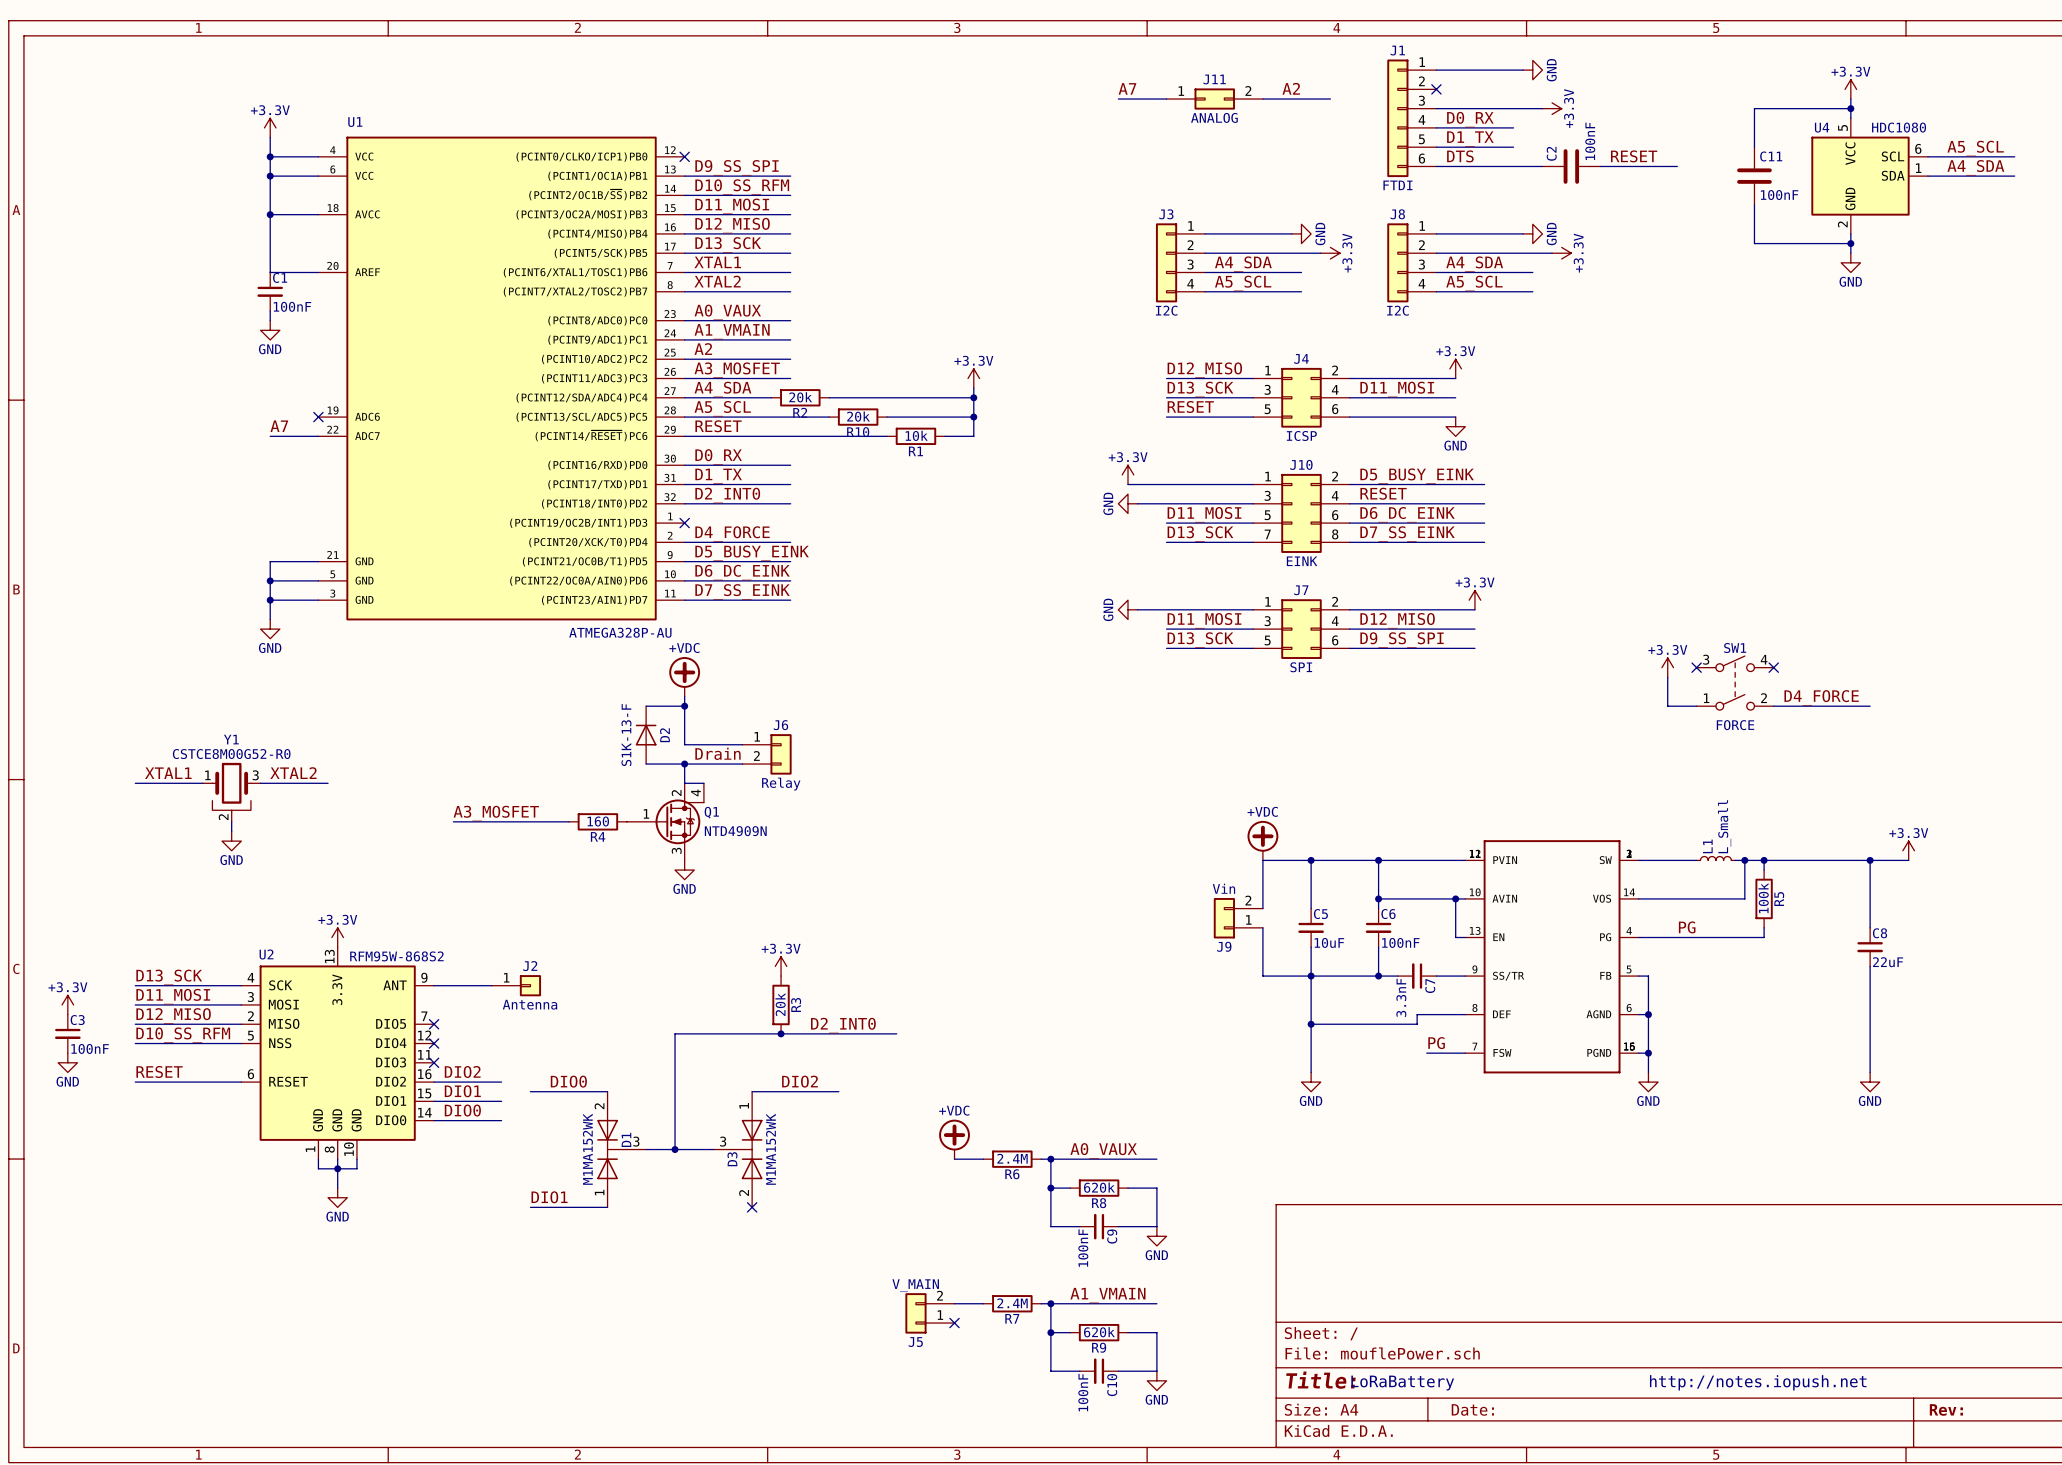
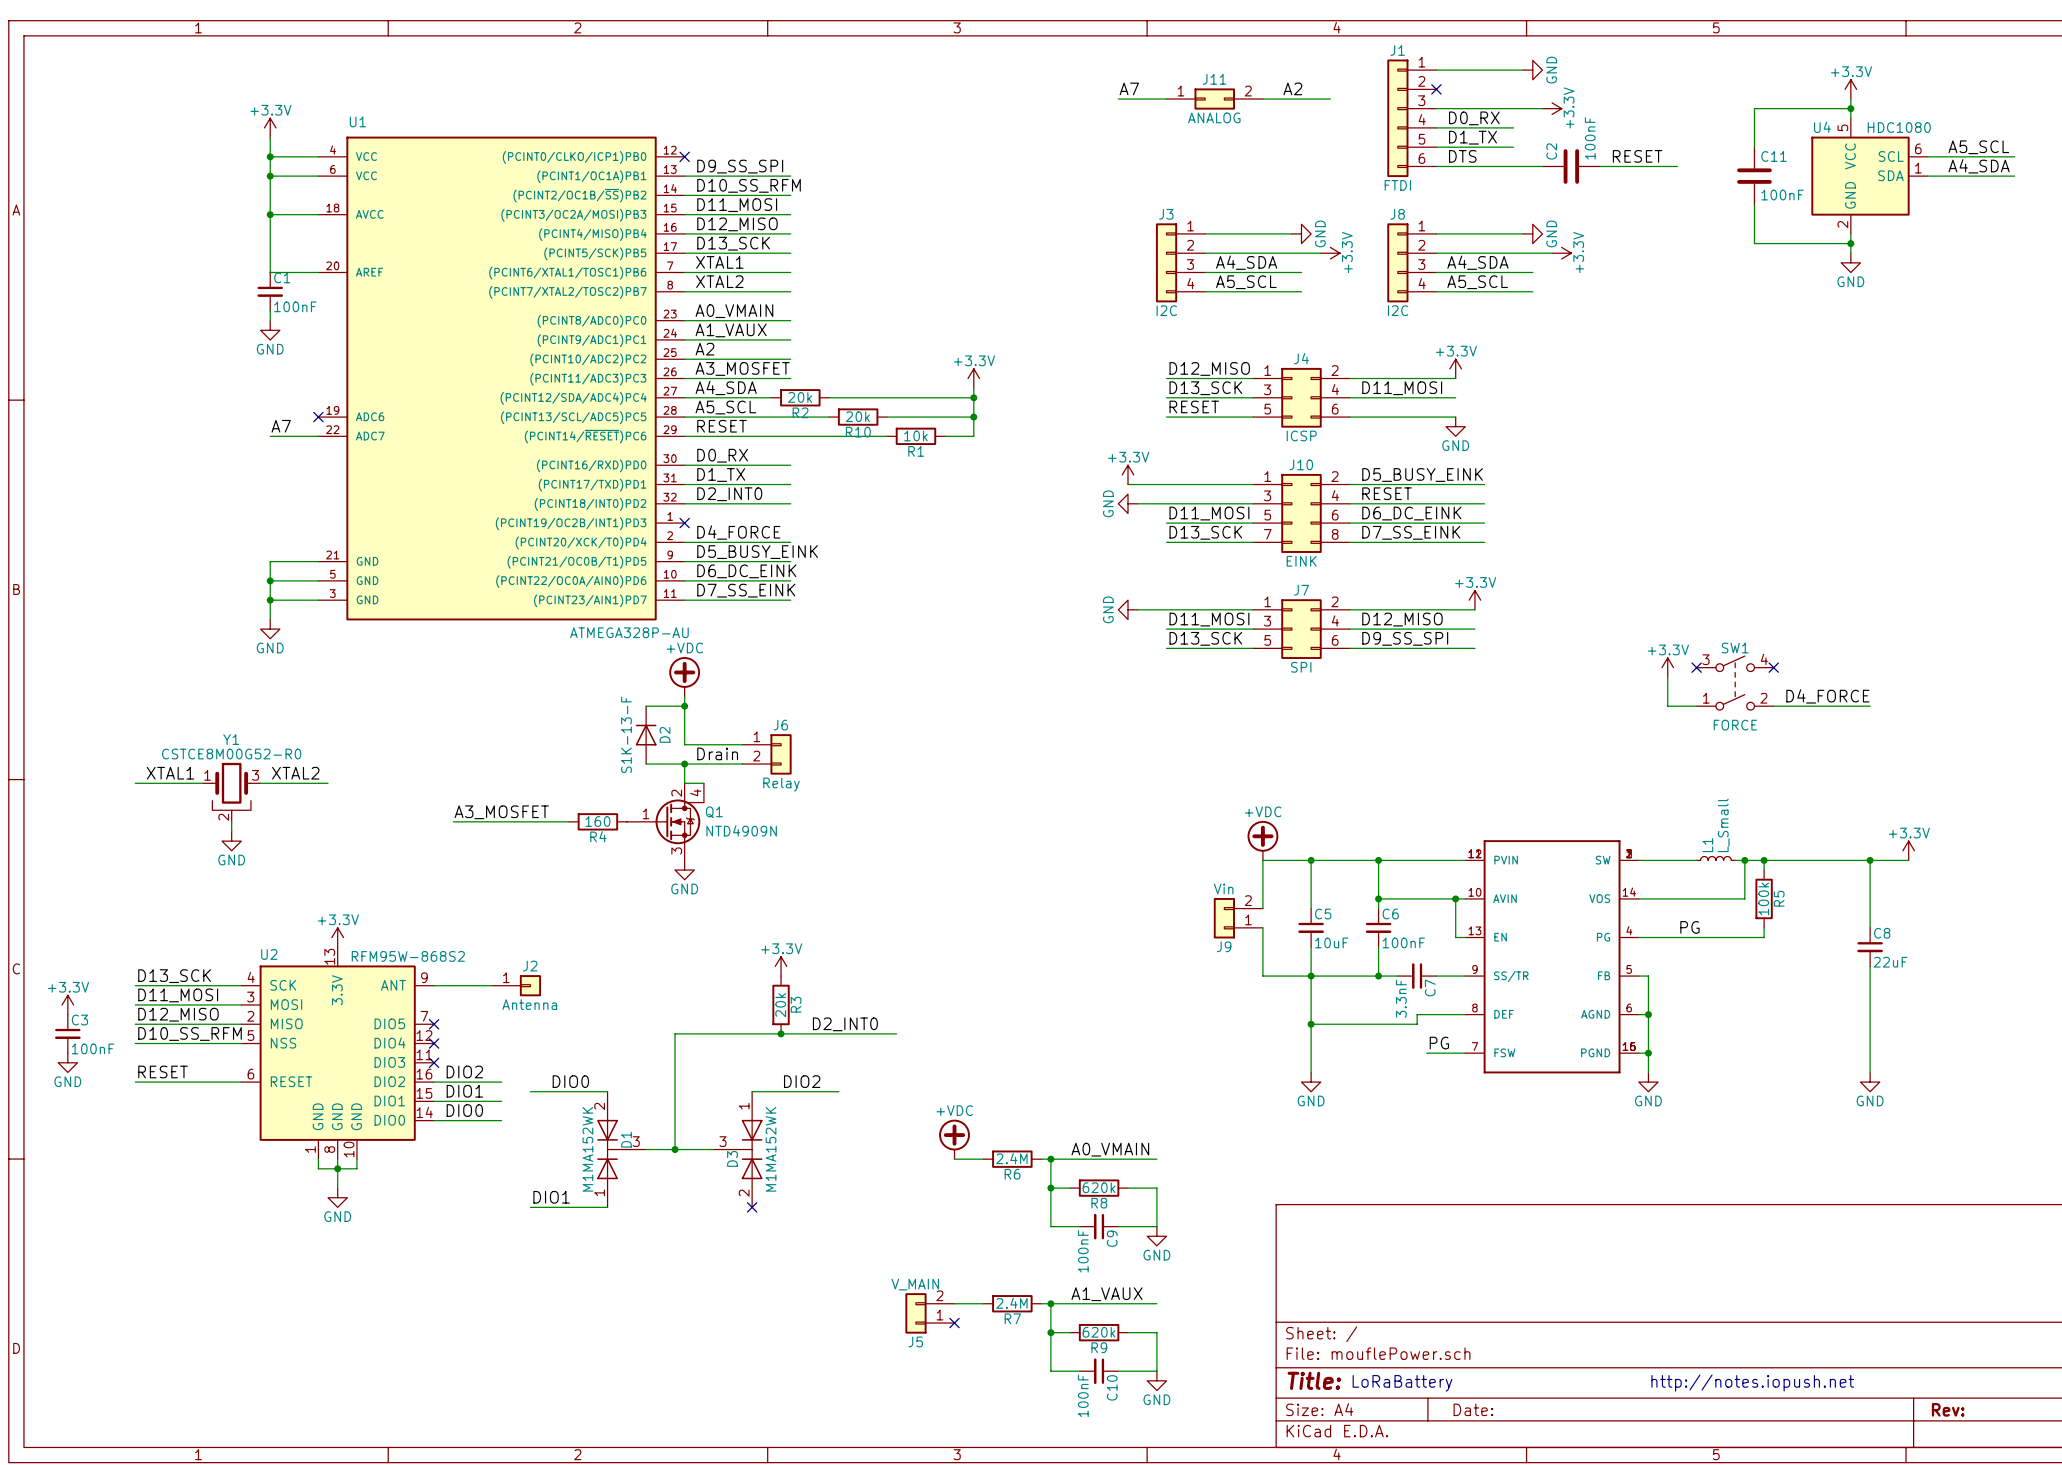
label: A0_VAUX (727, 312) -> A0_VMAIN (734, 311)
label: A1_VMAIN (732, 331) -> A1_VAUX (731, 330)
label: A0_VAUX (1103, 1150) -> A0_VMAIN (1110, 1149)
label: A1_VMAIN (1107, 1295) -> A1_VAUX (1107, 1294)

